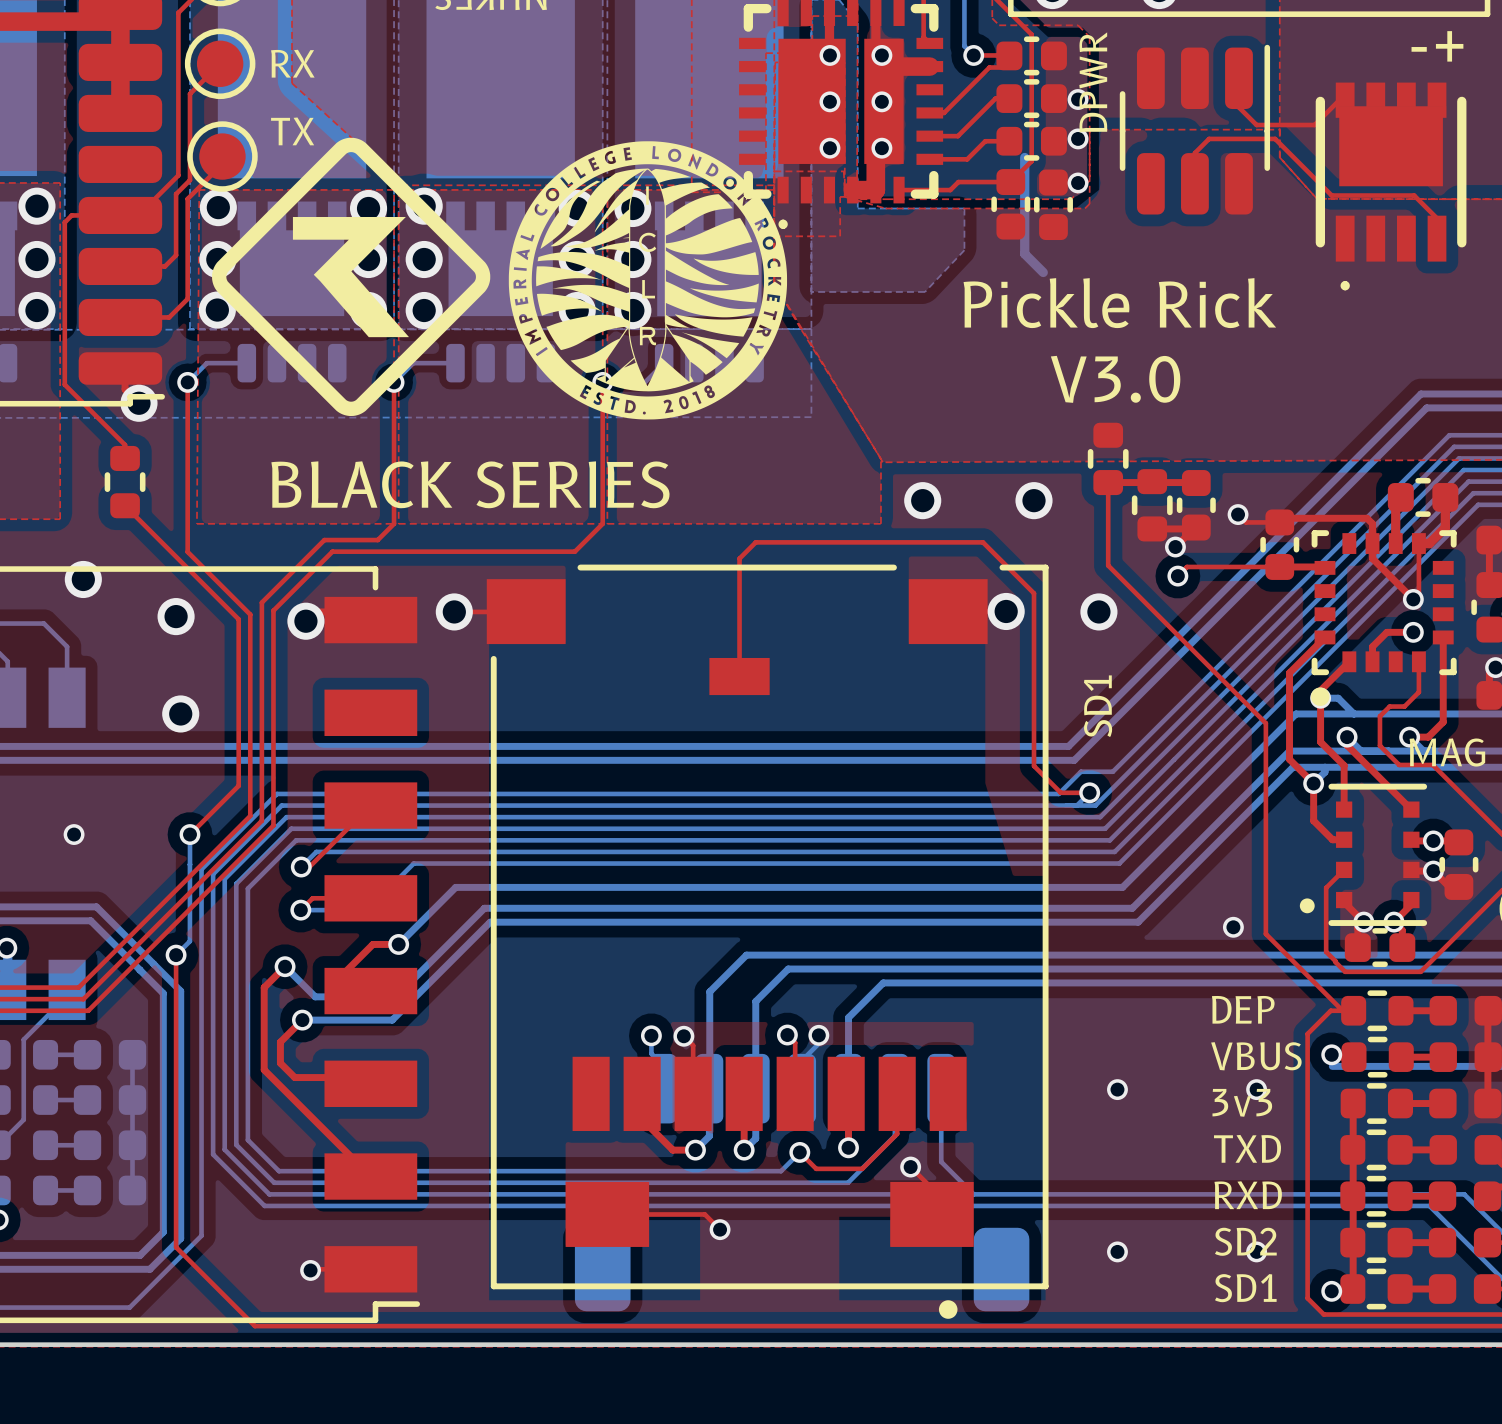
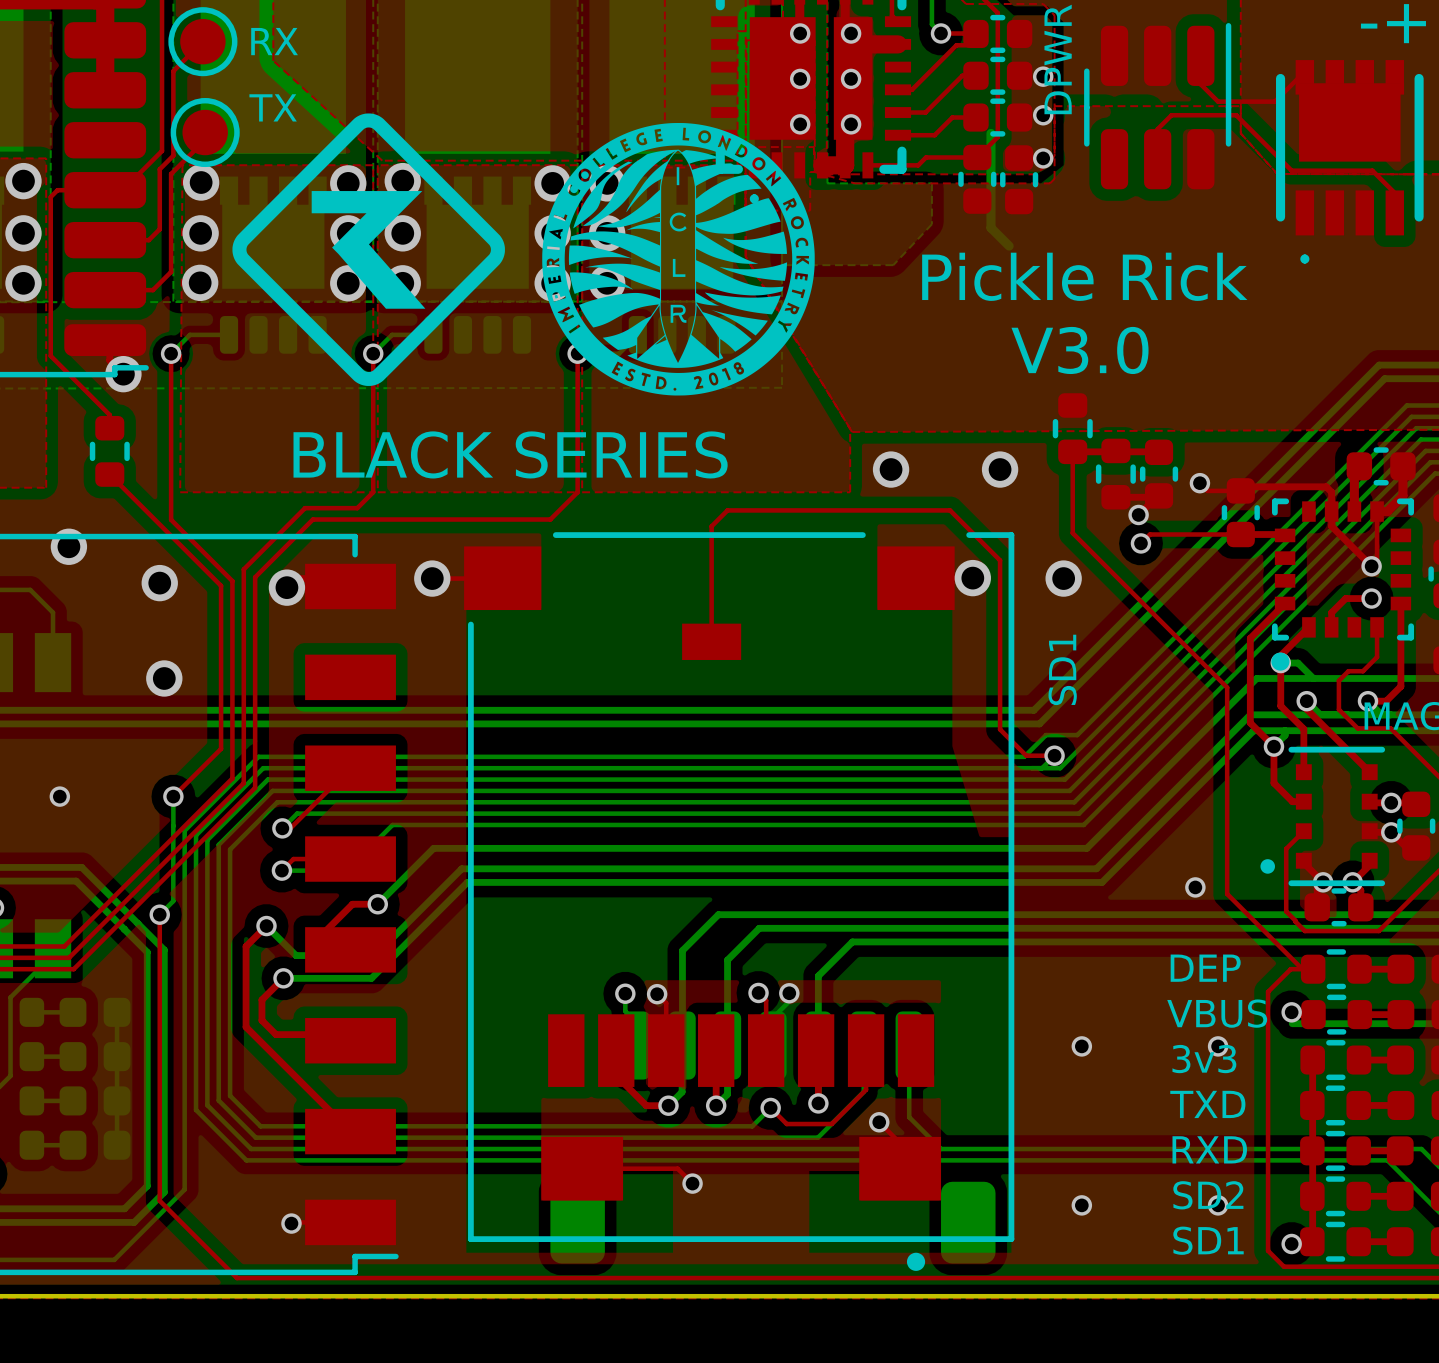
drawing position: (351, 276) -> (368, 249)
drawing position: (647, 280) -> (678, 259)
text position: BLACK SERIES (470, 484) -> BLACK SERIES (510, 454)

